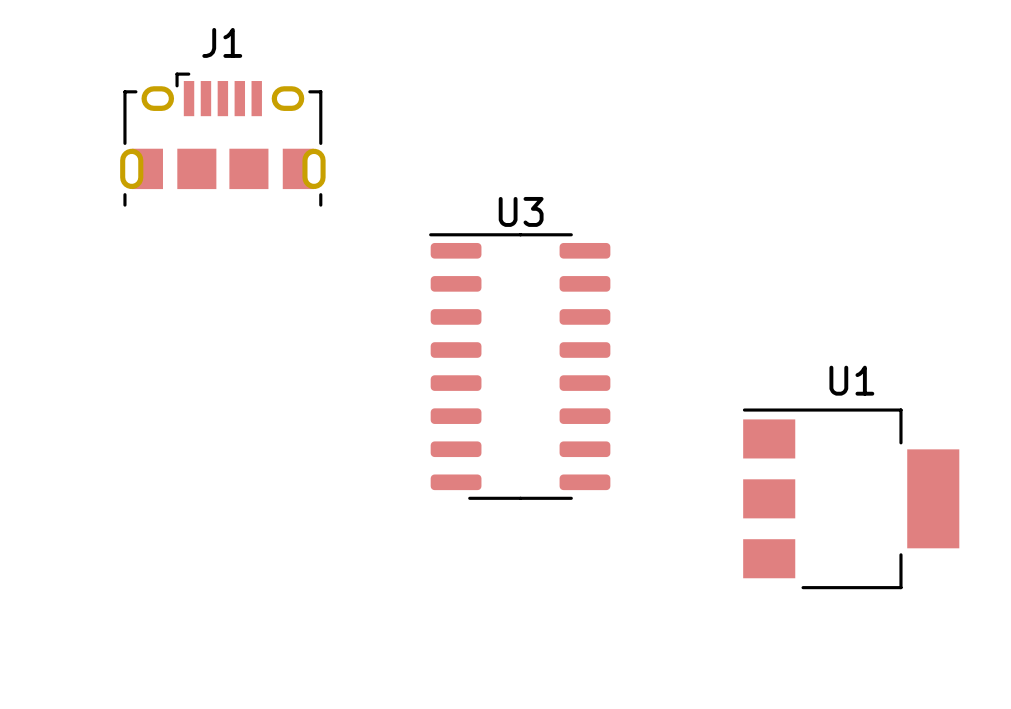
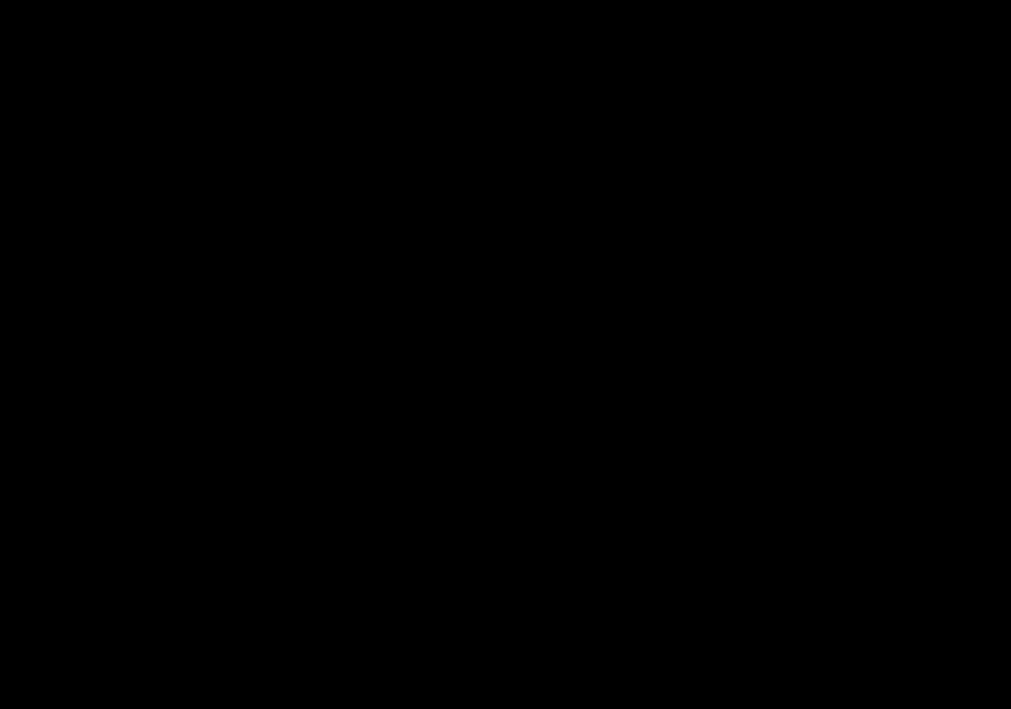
J1: (222, 139) -> none
U3: (519, 366) -> none
U1: (851, 498) -> none

